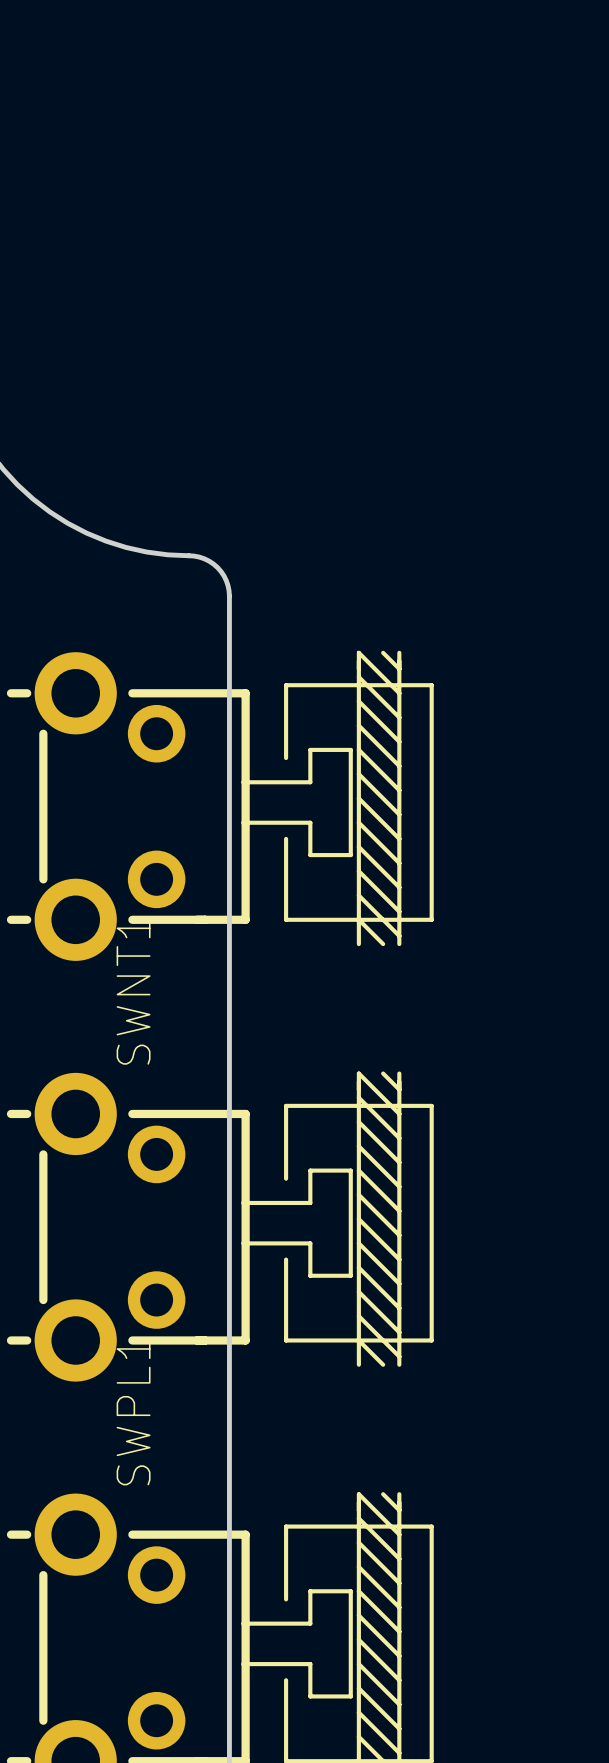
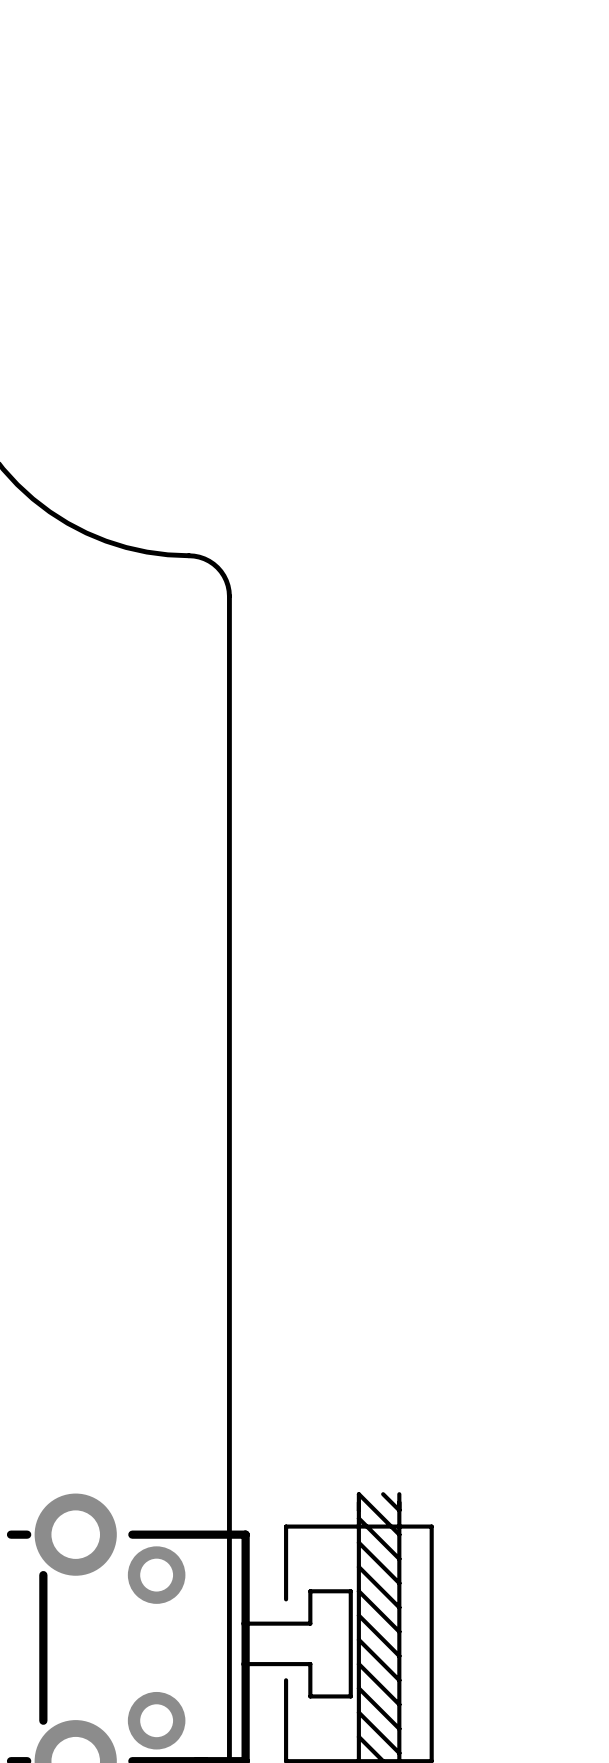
SWNT1: (220, 805) -> none
SWPL1: (220, 1226) -> none

